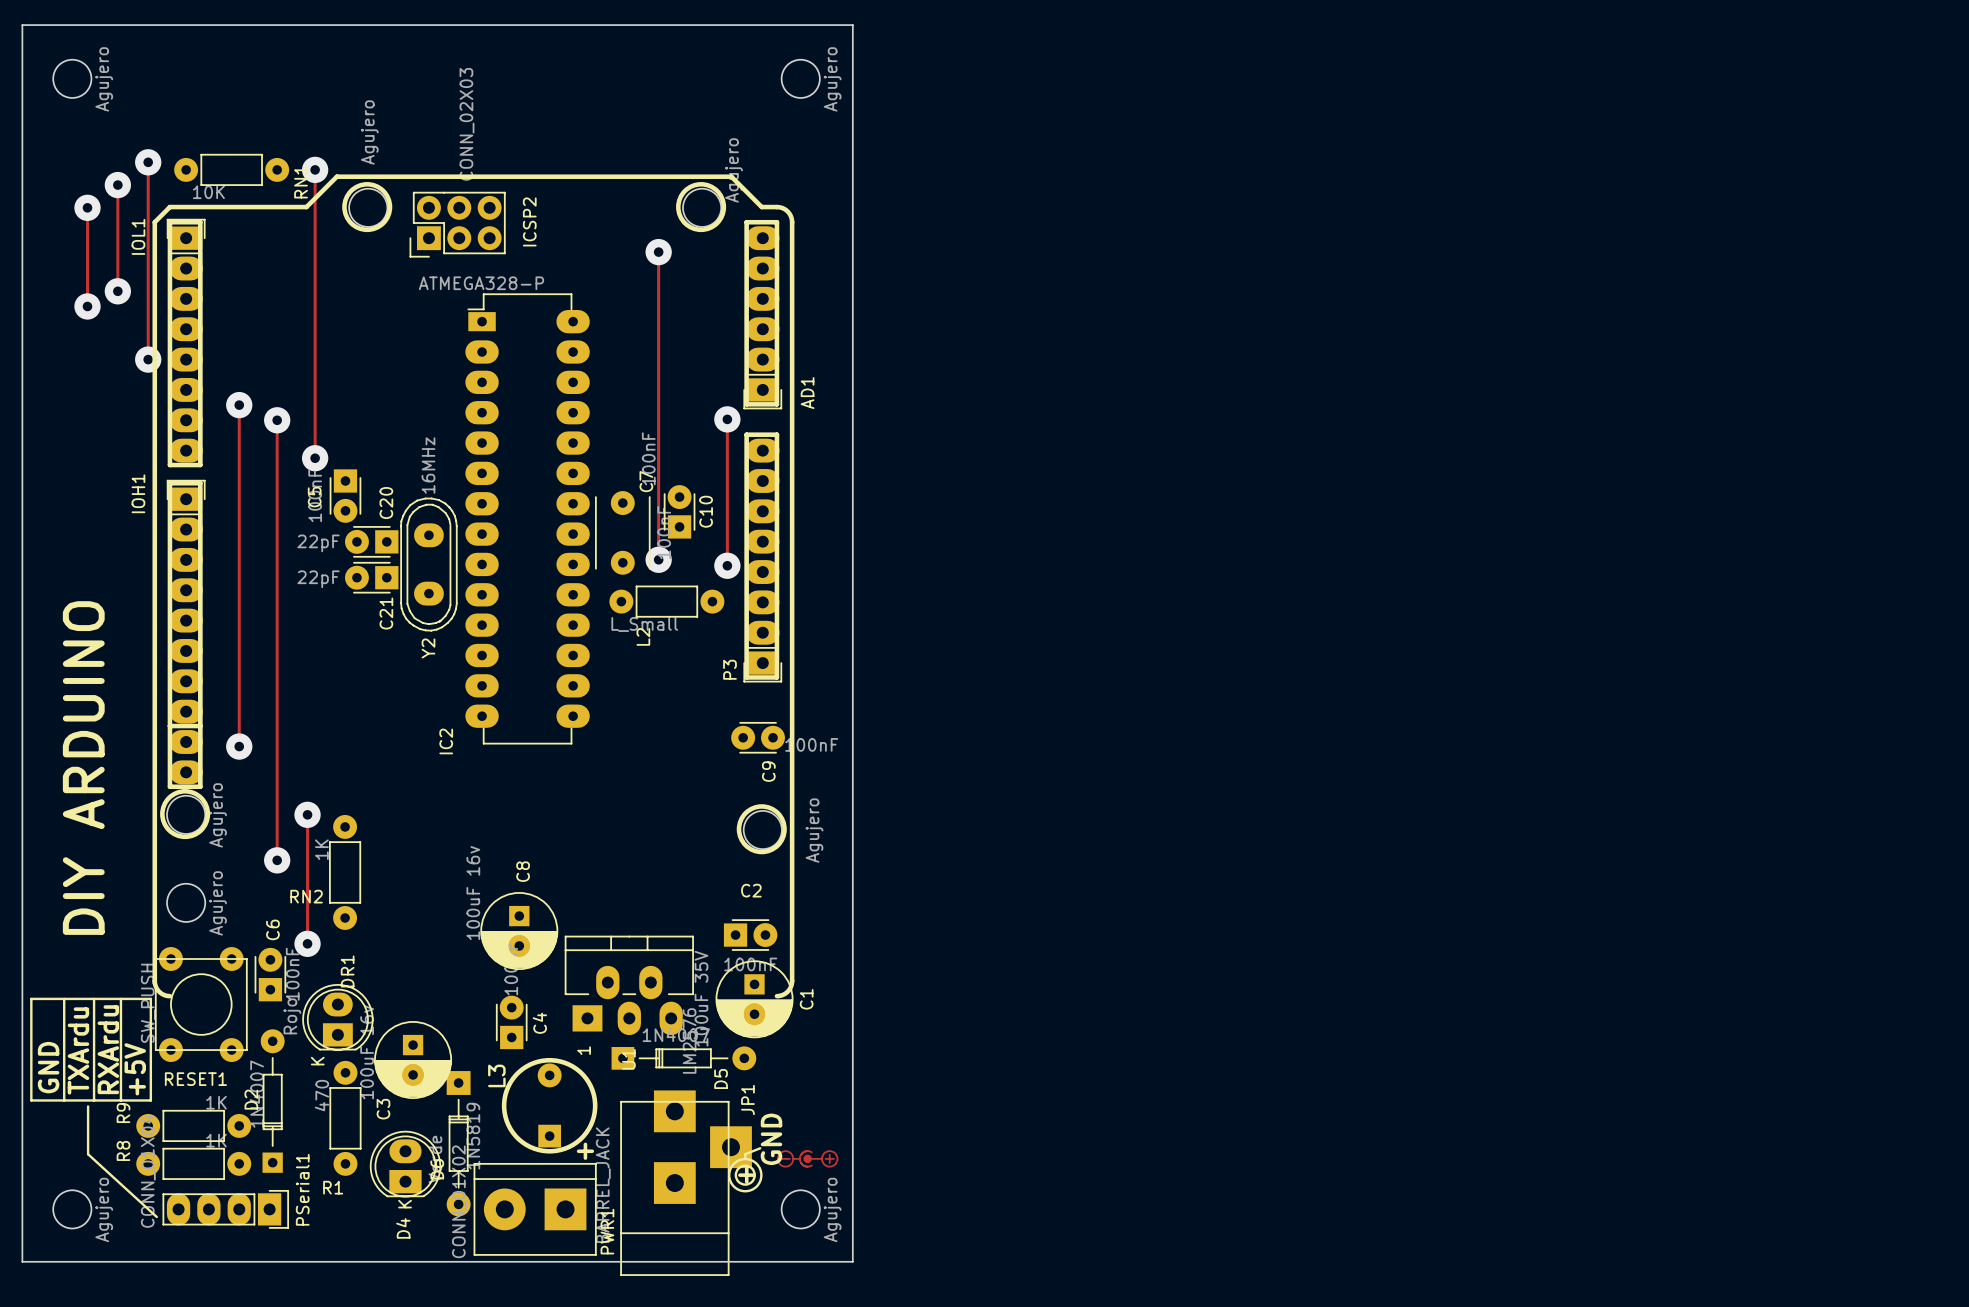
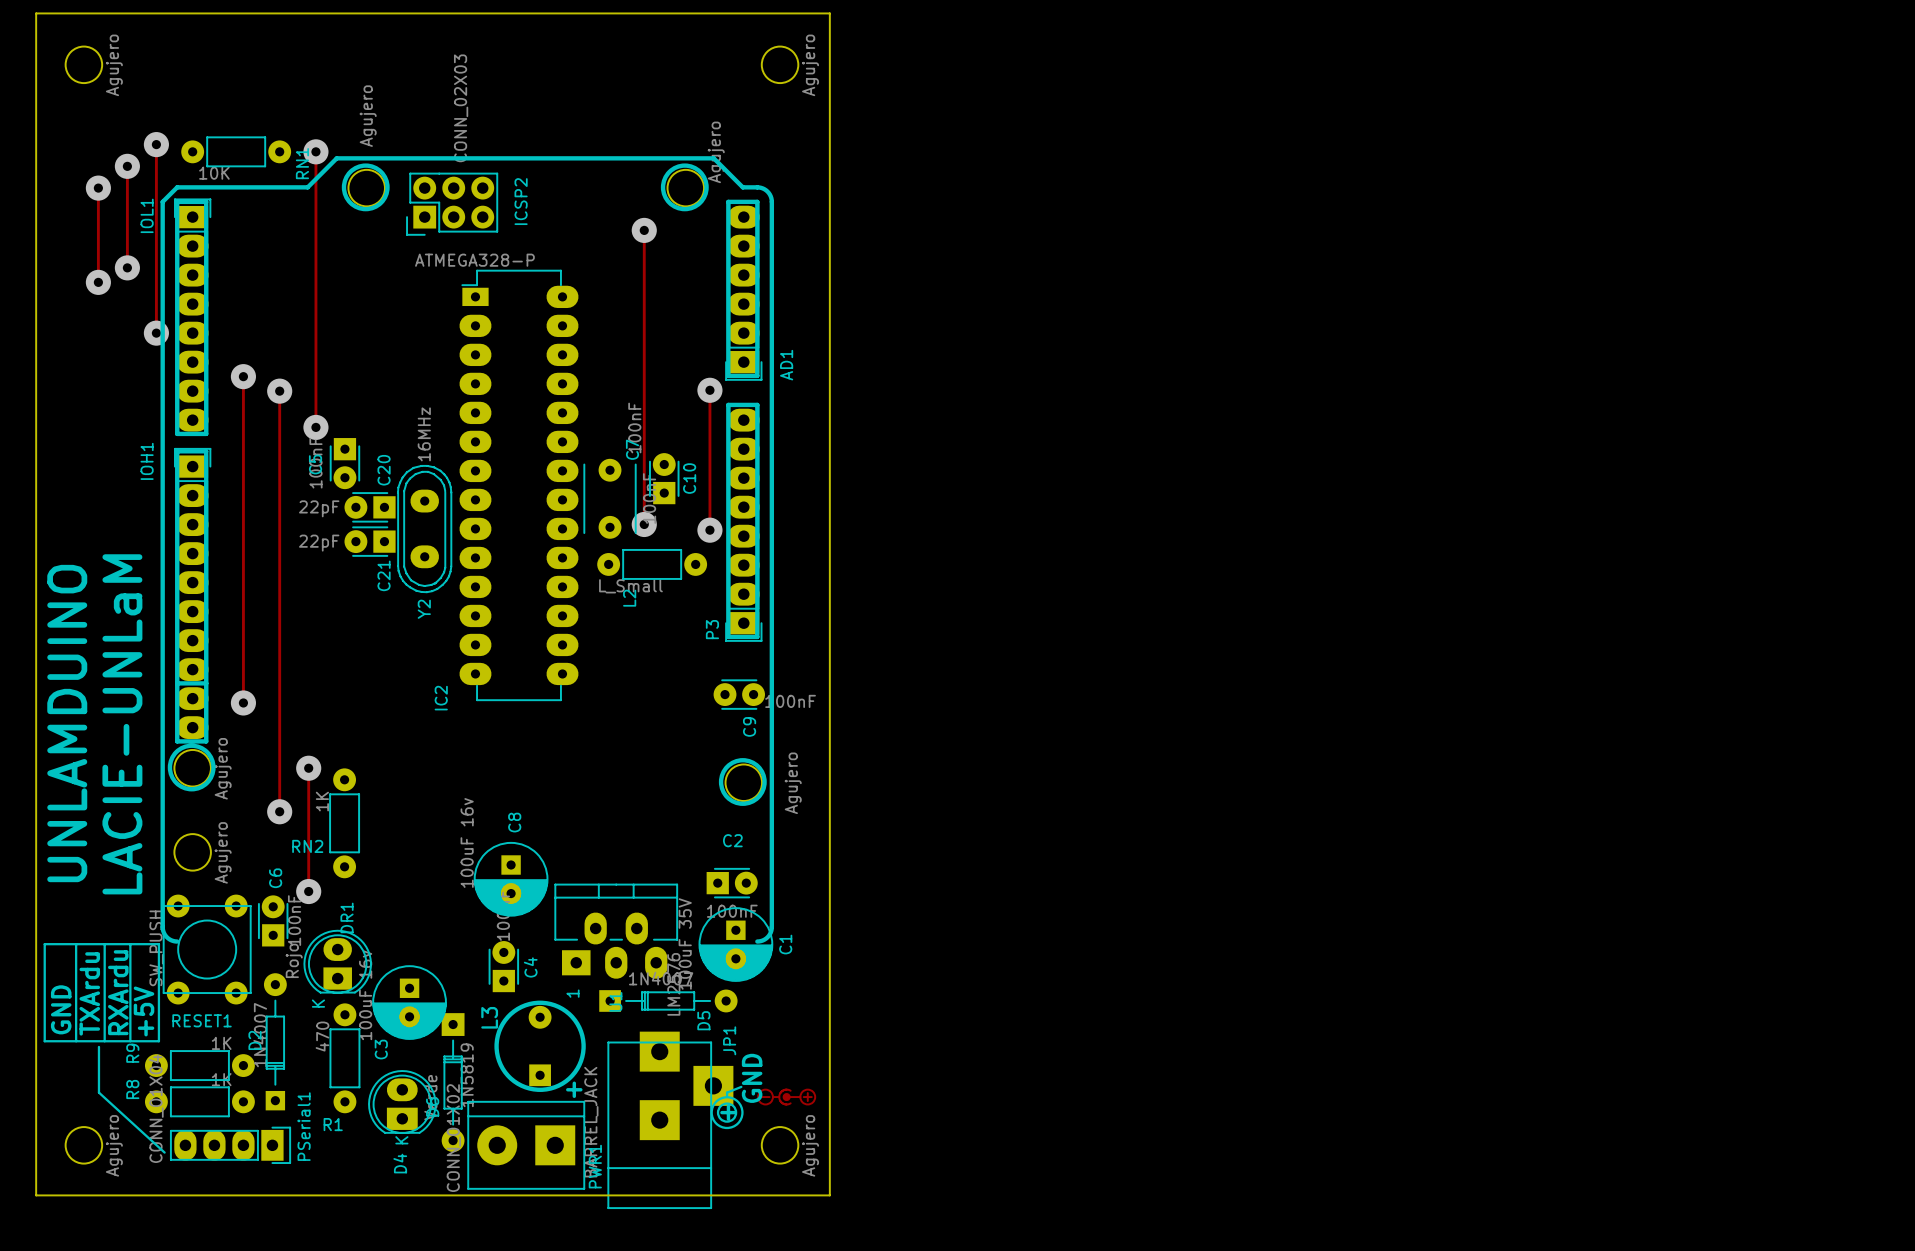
text: none -> UNLAMDUINO (67, 723)
text: DIY ARDUINO (83, 768) -> none
text: none -> LACIE-UNLaM (122, 724)

